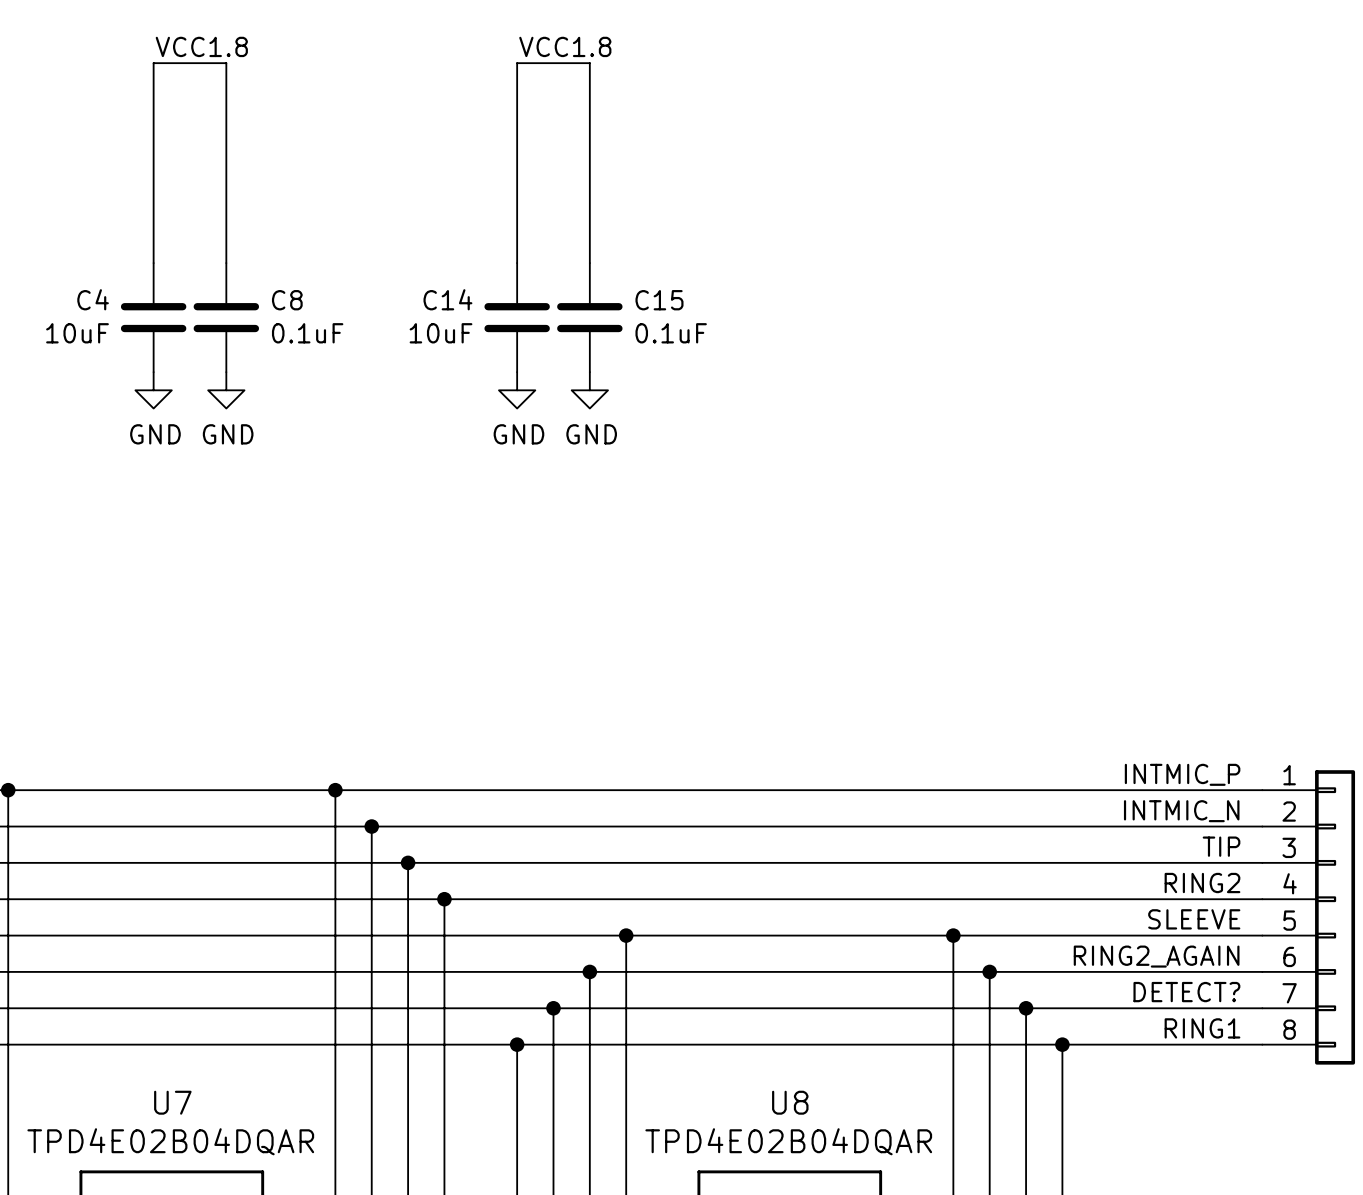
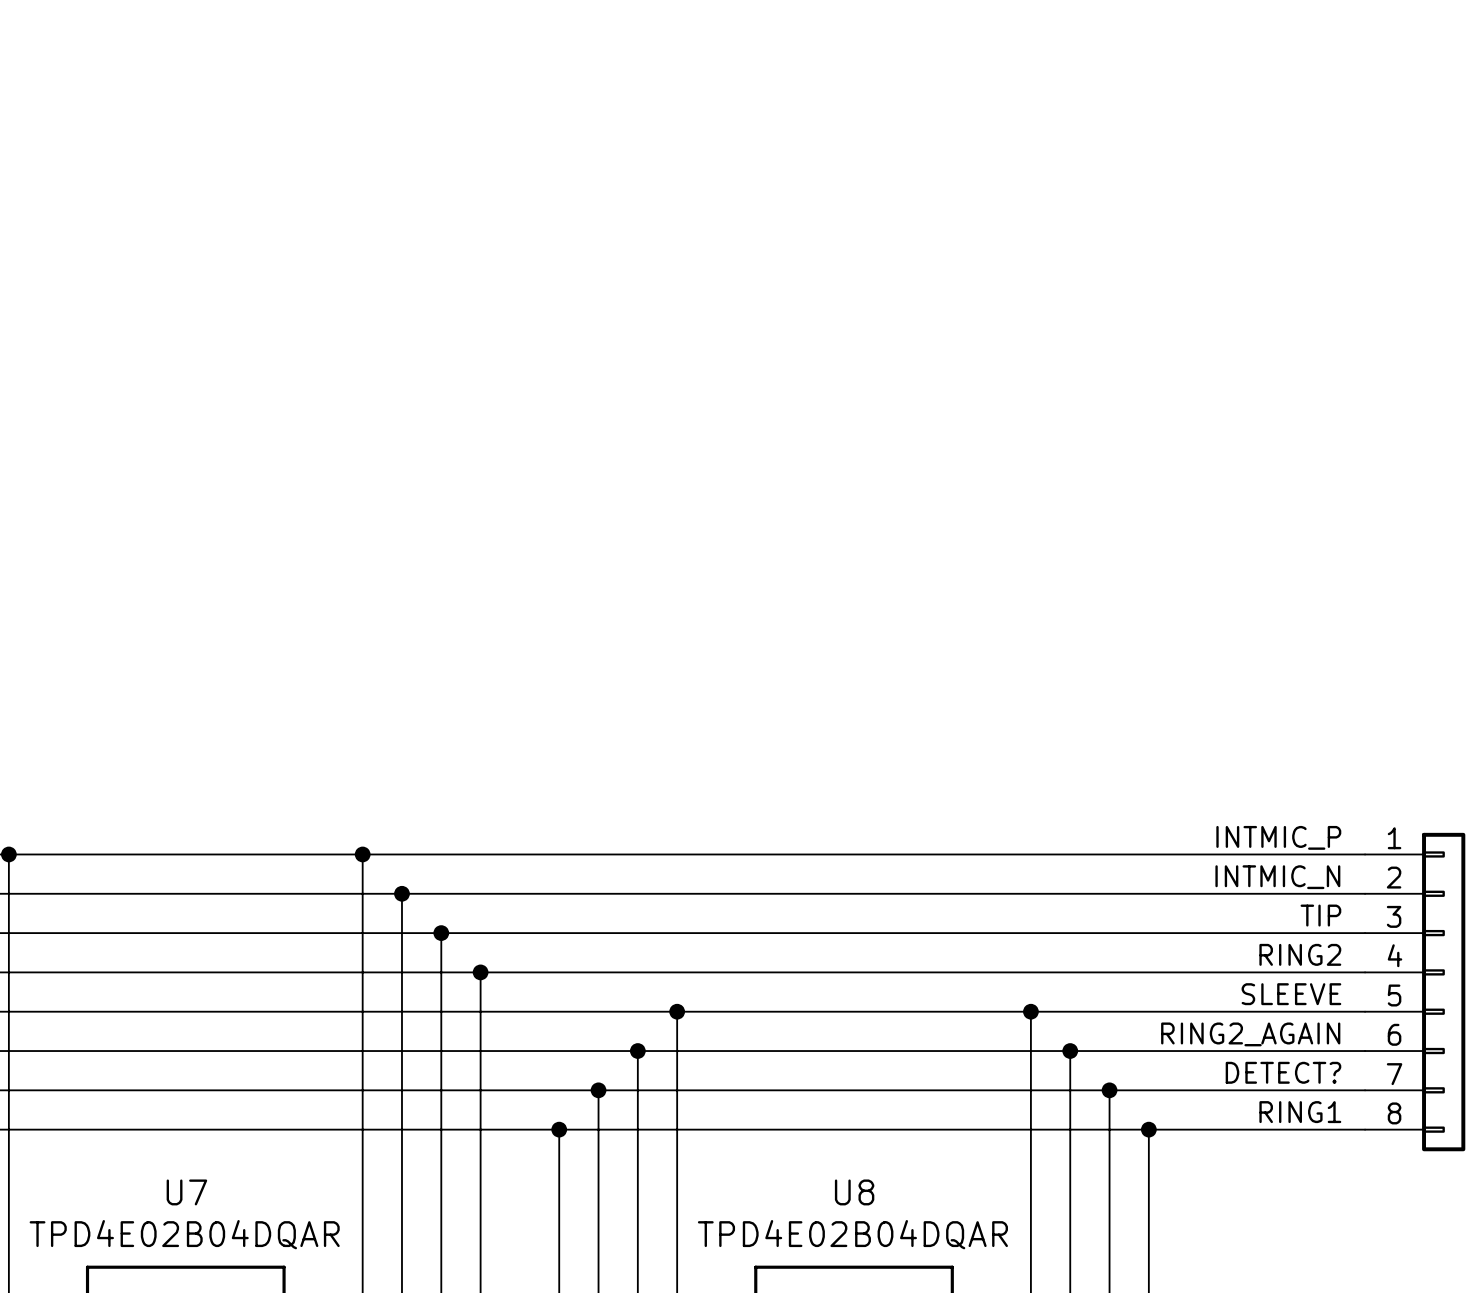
label: VCC1.8 (201, 46) -> none
label: VCC1.8 (565, 46) -> none
wire: (153, 263) (153, 63) (226, 63) (226, 263) -> none
wire: (517, 263) (517, 63) (589, 63) (589, 263) -> none
C4: 10uF (153, 317) -> none
C8: 0.1uF (226, 317) -> none
C14: 10uF (517, 317) -> none
C15: 0.1uF (589, 317) -> none
power symbol: GND (153, 390) -> none
power symbol: GND (226, 390) -> none
power symbol: GND (517, 390) -> none
power symbol: GND (589, 390) -> none

